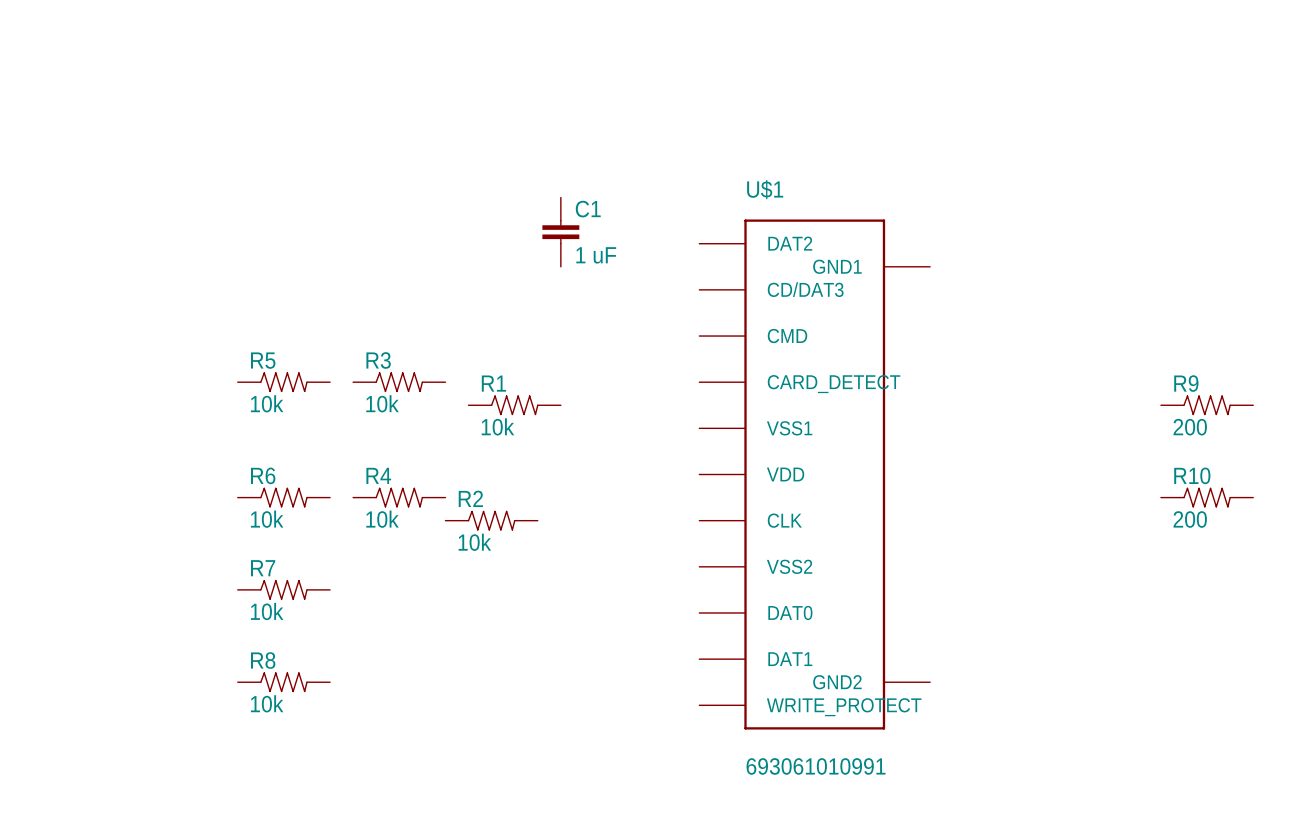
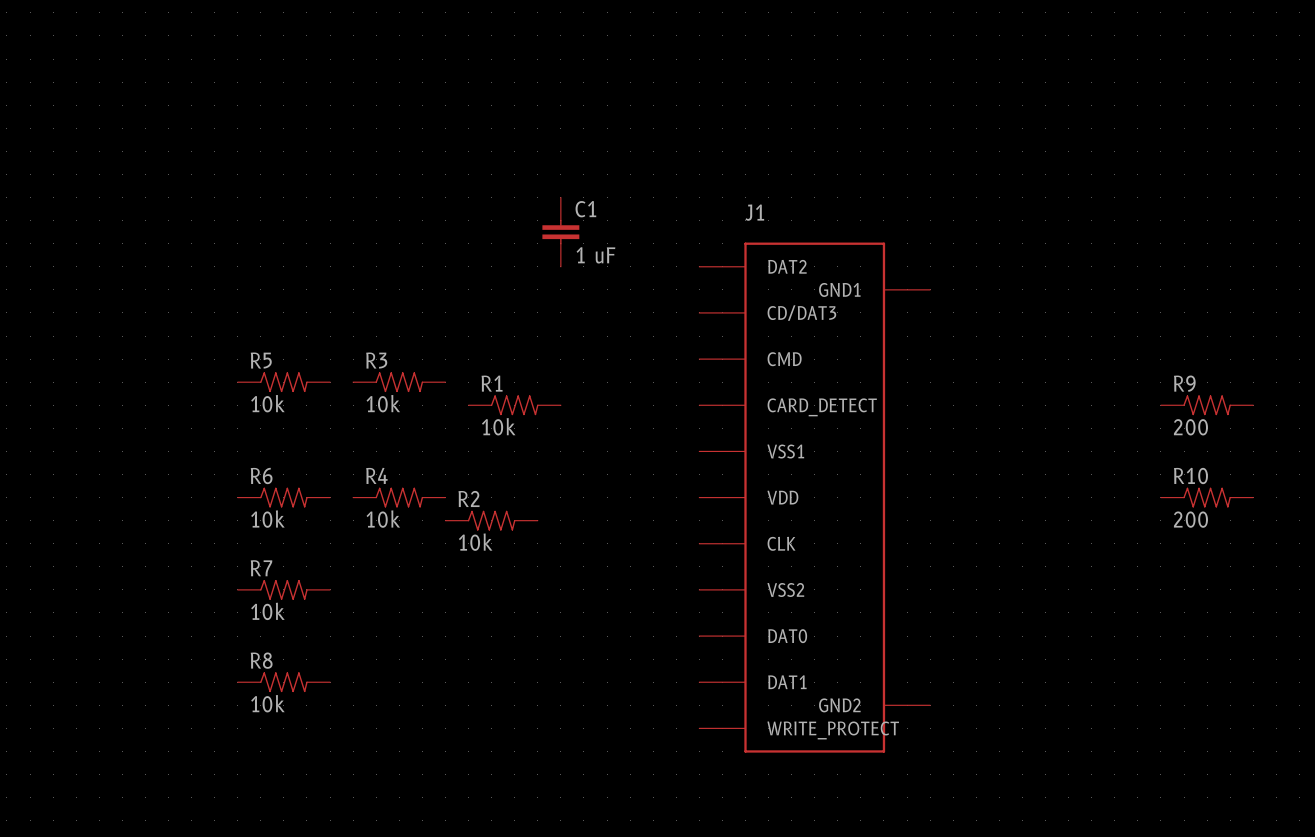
U$1: 693061010991 (814, 474) -> none
J1: none -> (814, 497)

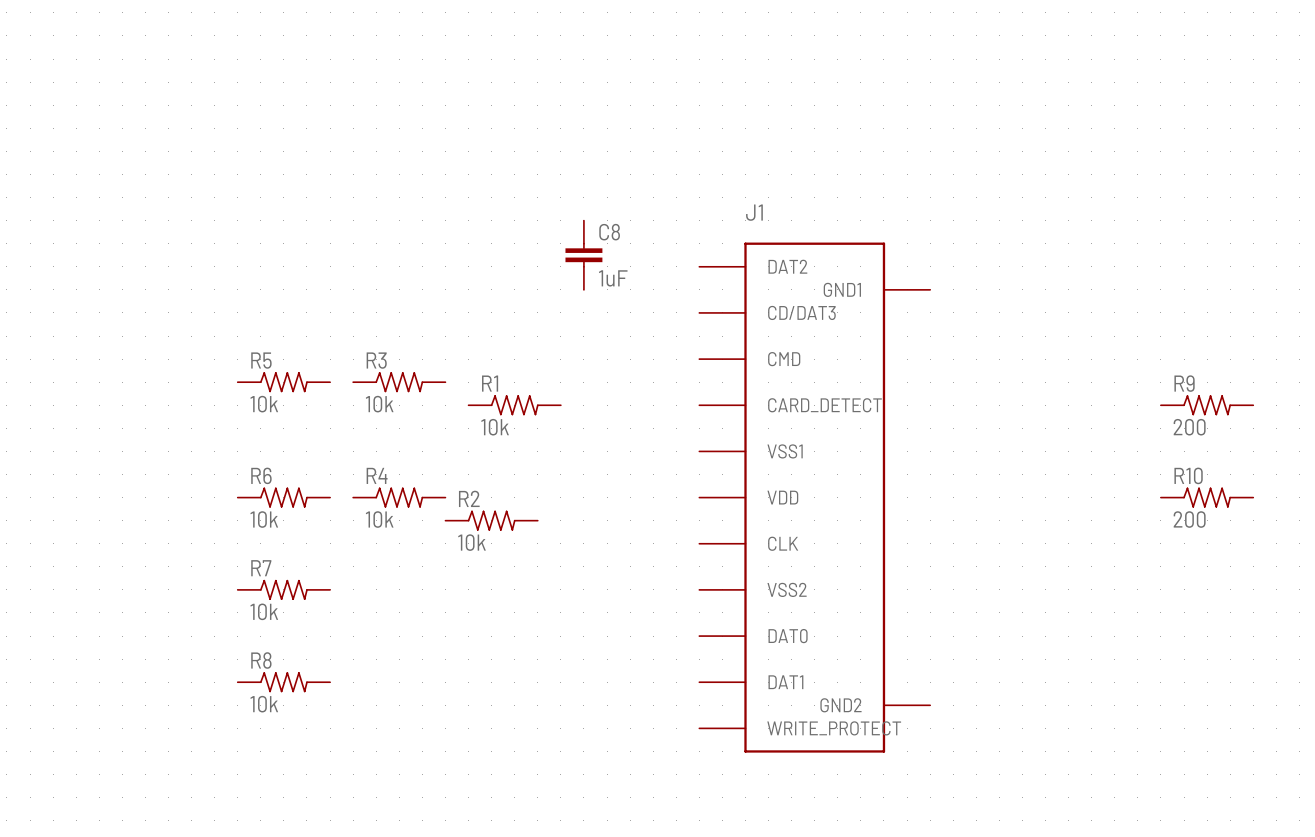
C1: 1 uF (560, 232) -> none
C8: none -> 1uF (583, 255)

